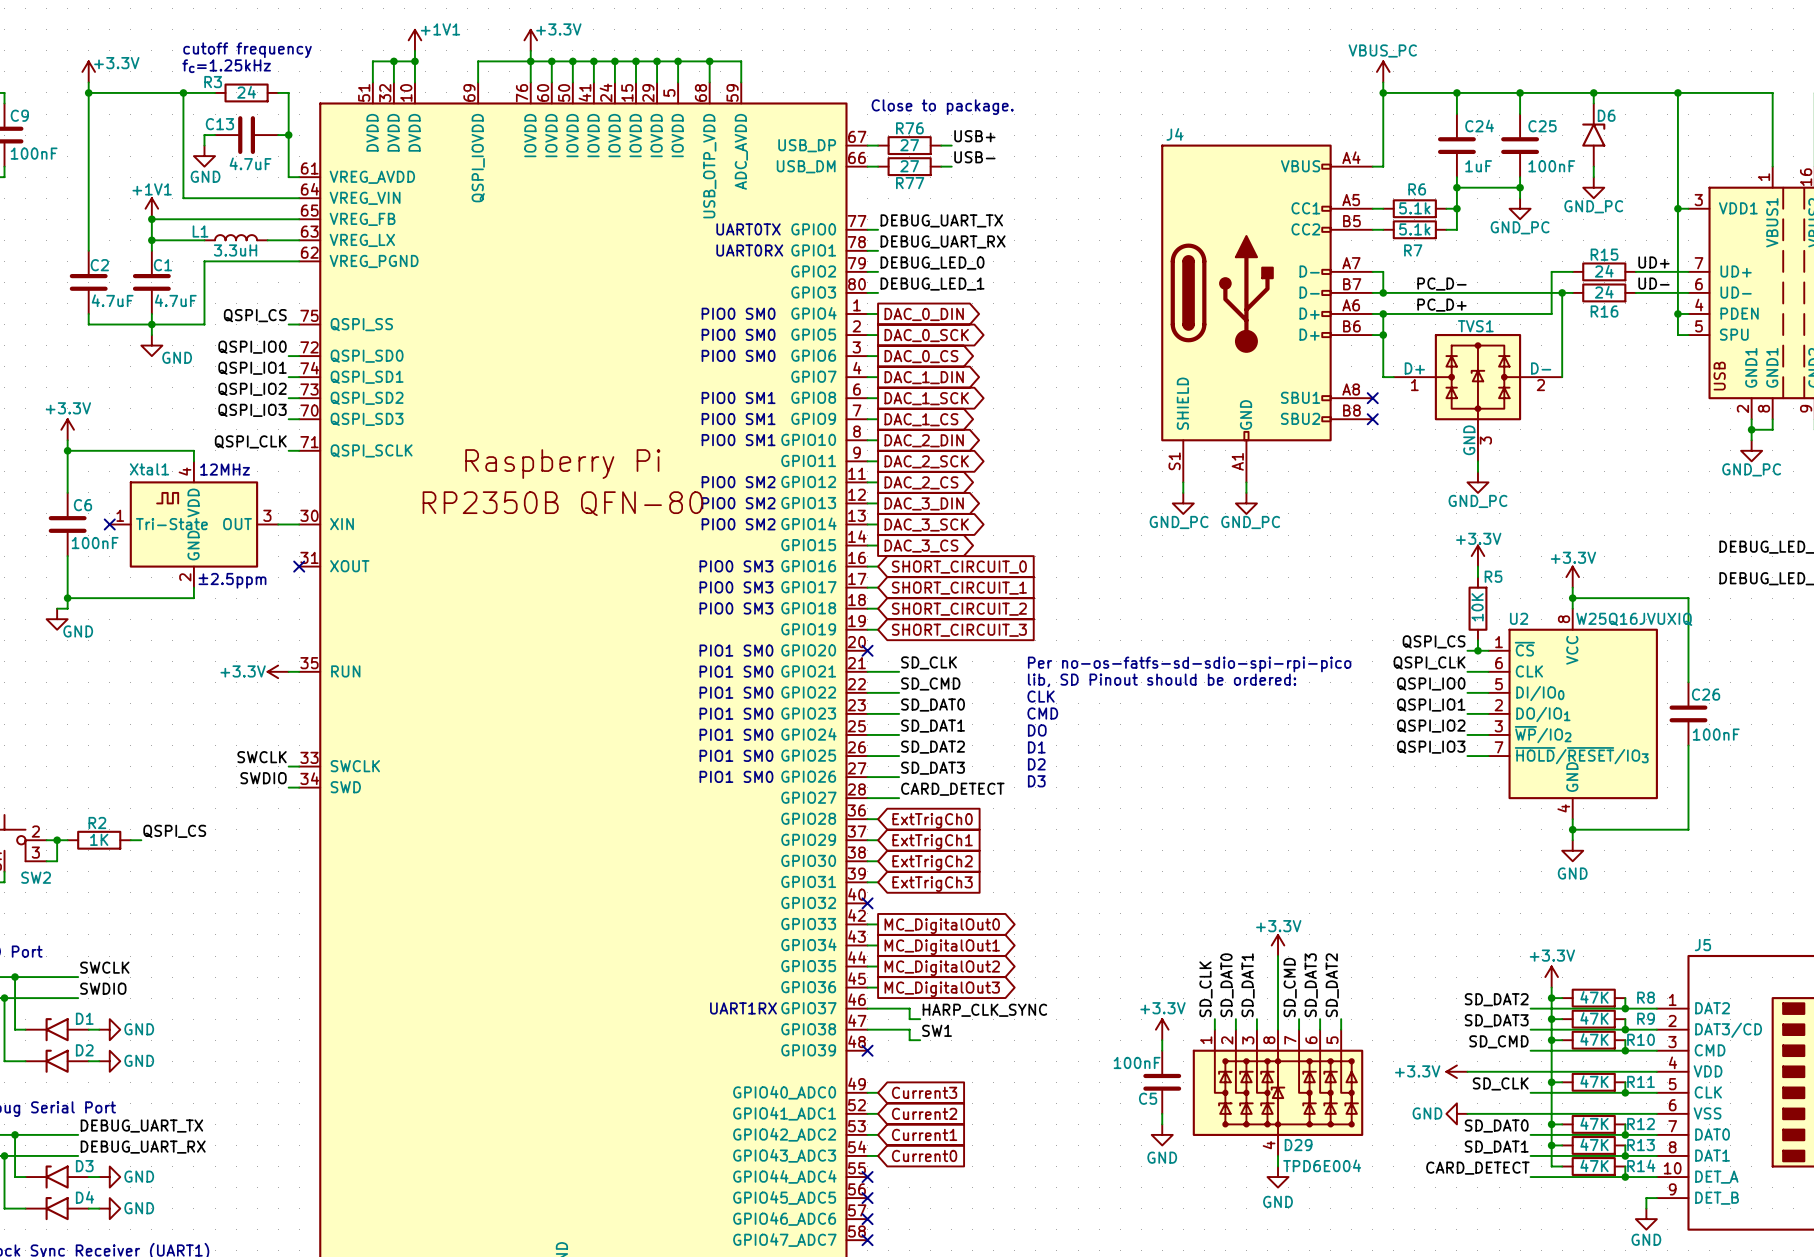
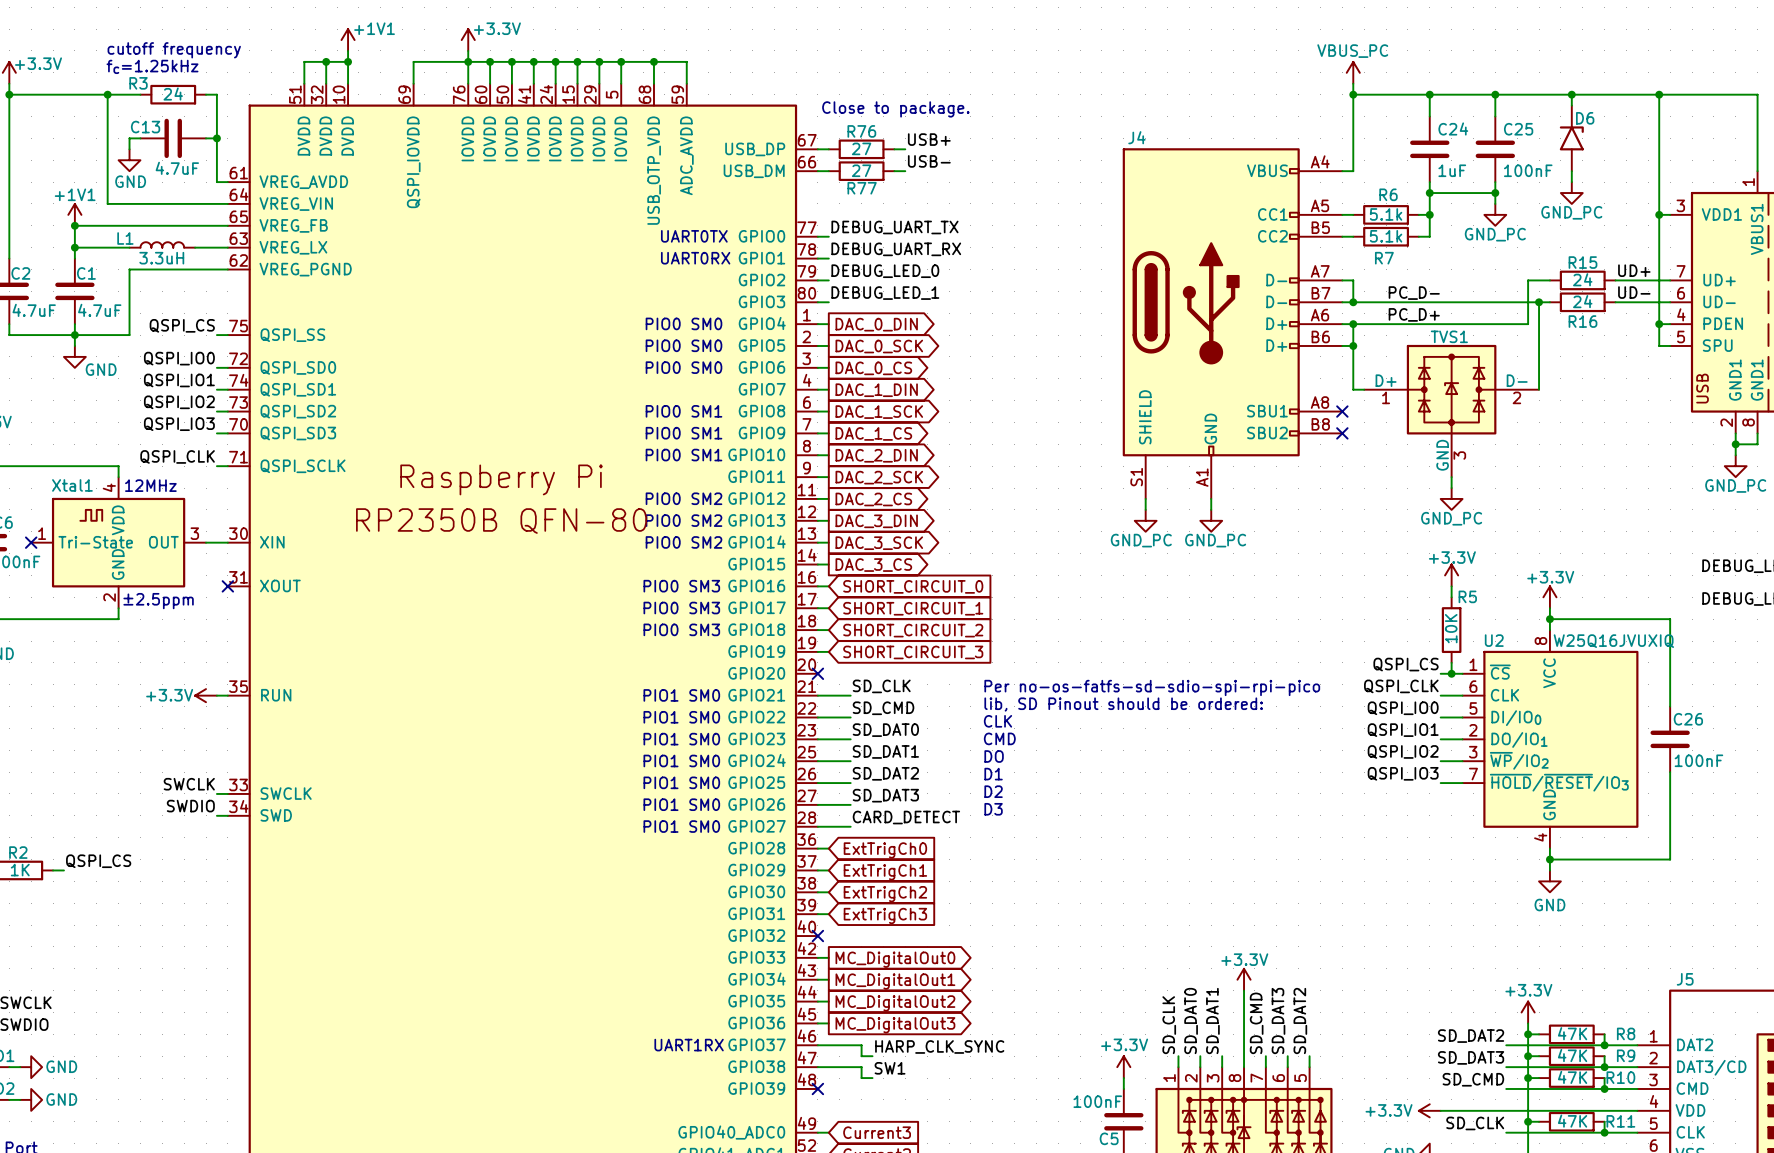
text position: PIO1 SM0 (736, 650) -> PIO1 SM0 (681, 826)

